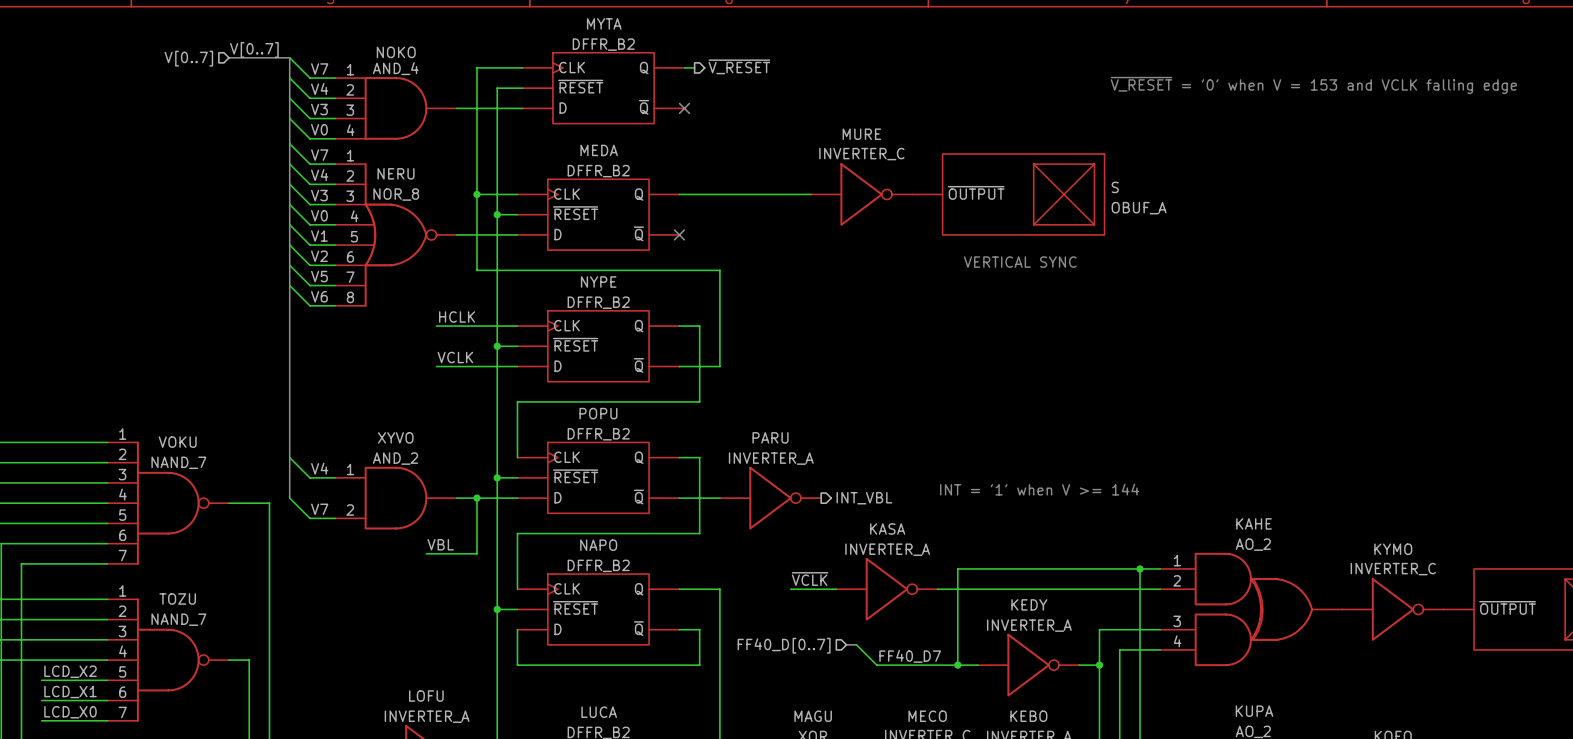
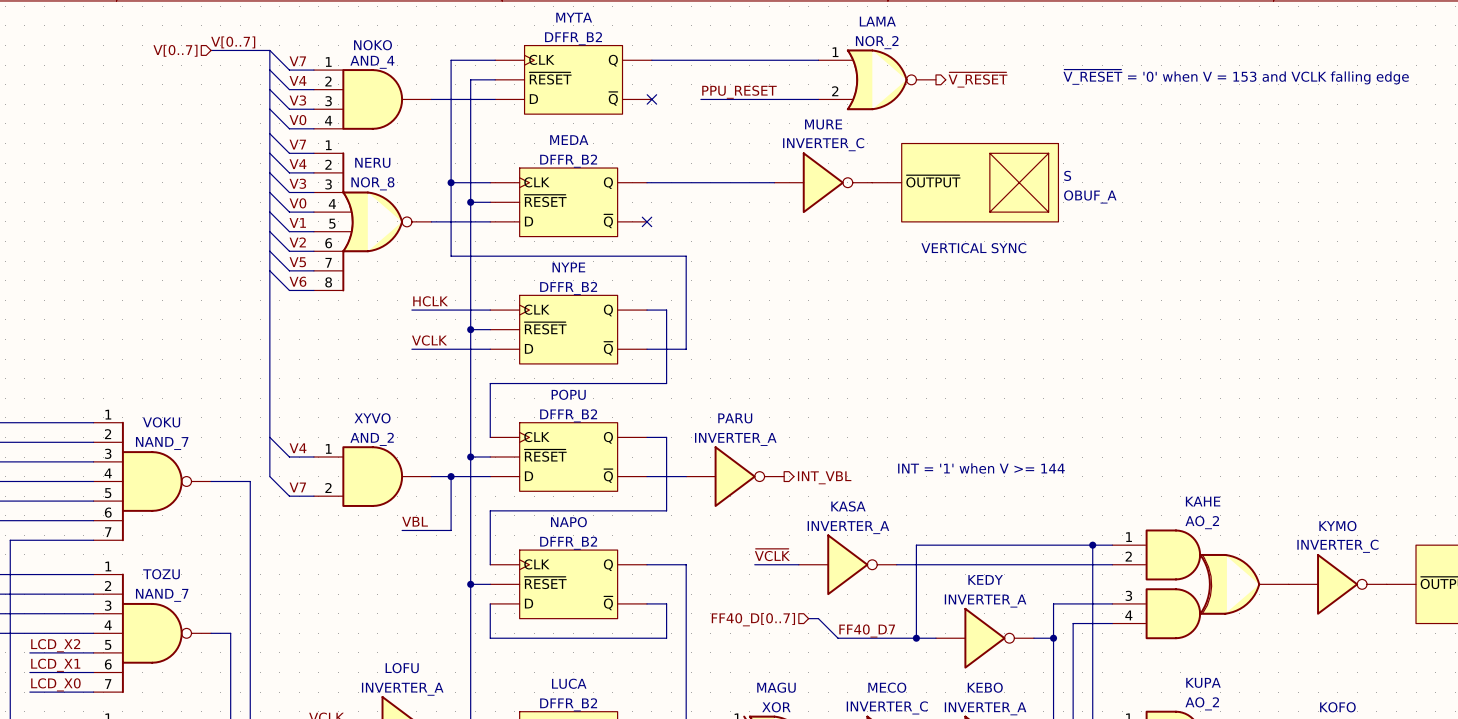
hierarchical label: ~{V_RESET} (739, 66) -> none
wire: none -> (661, 60) (818, 60)
hierarchical label: none -> ~{V_RESET} (977, 79)
LAMA: none -> NOR_2 (877, 79)
label: none -> PPU_RESET (739, 92)
wire: none -> (700, 99) (818, 99)

